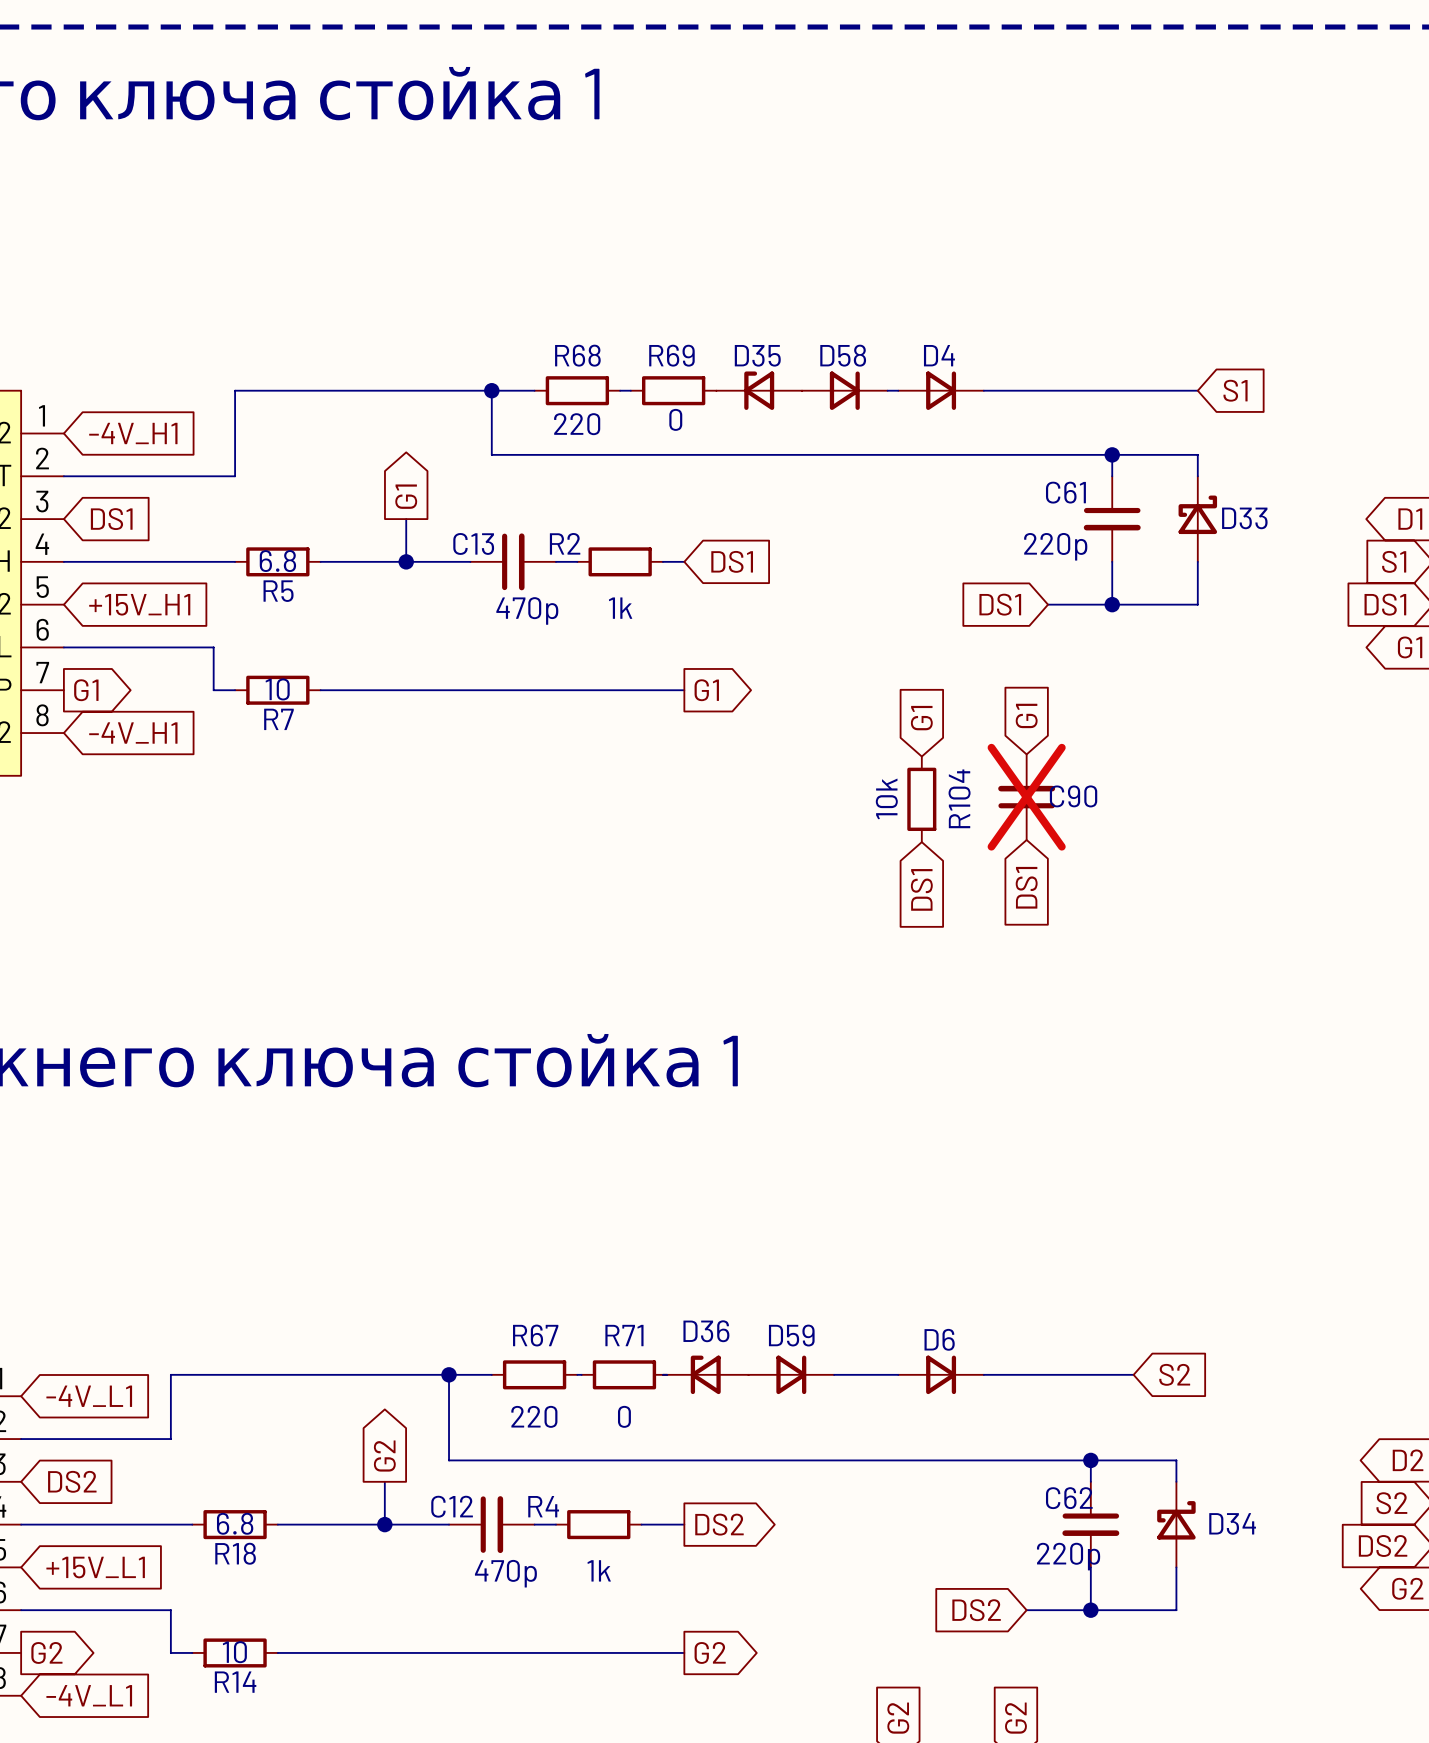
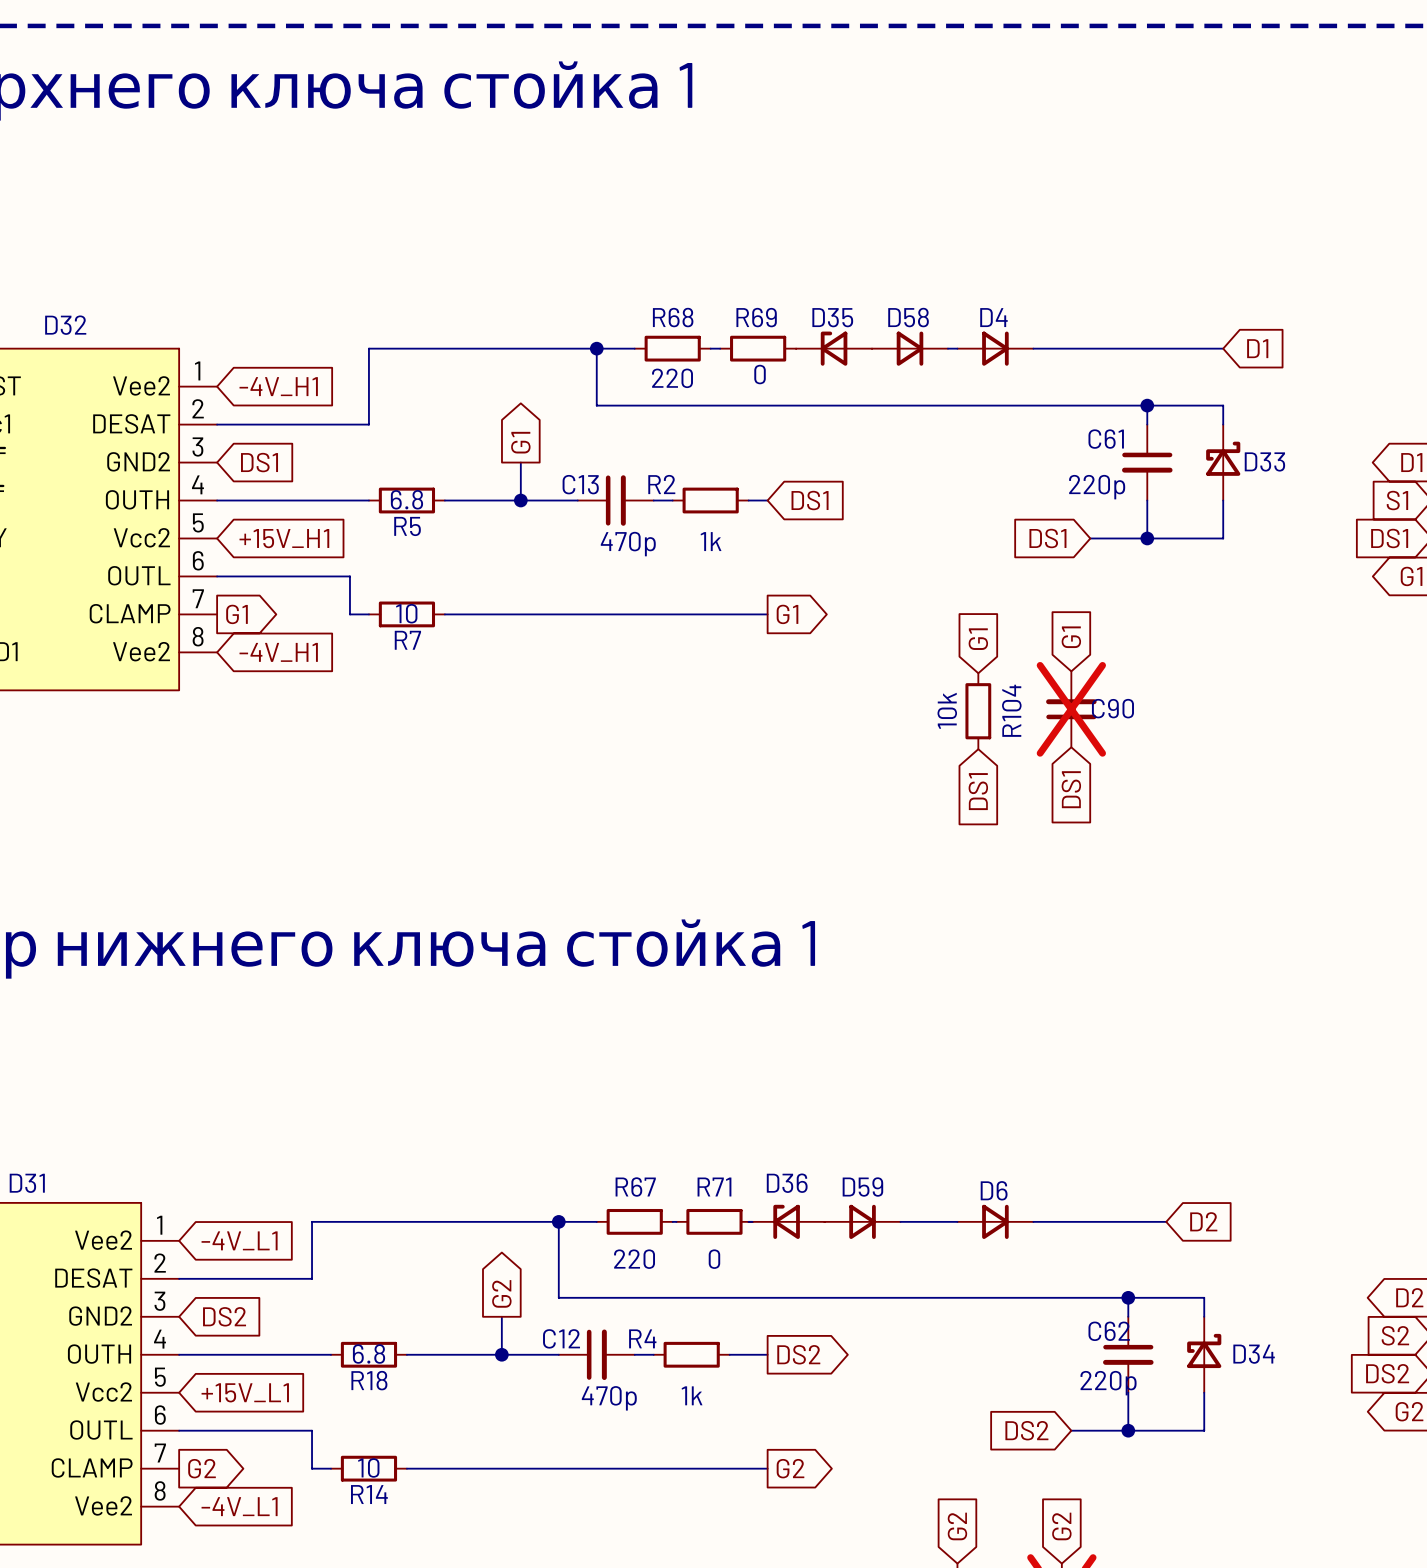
global label: S1 (1235, 390) -> D1 (1257, 348)
global label: S2 (1174, 1374) -> D2 (1203, 1221)

